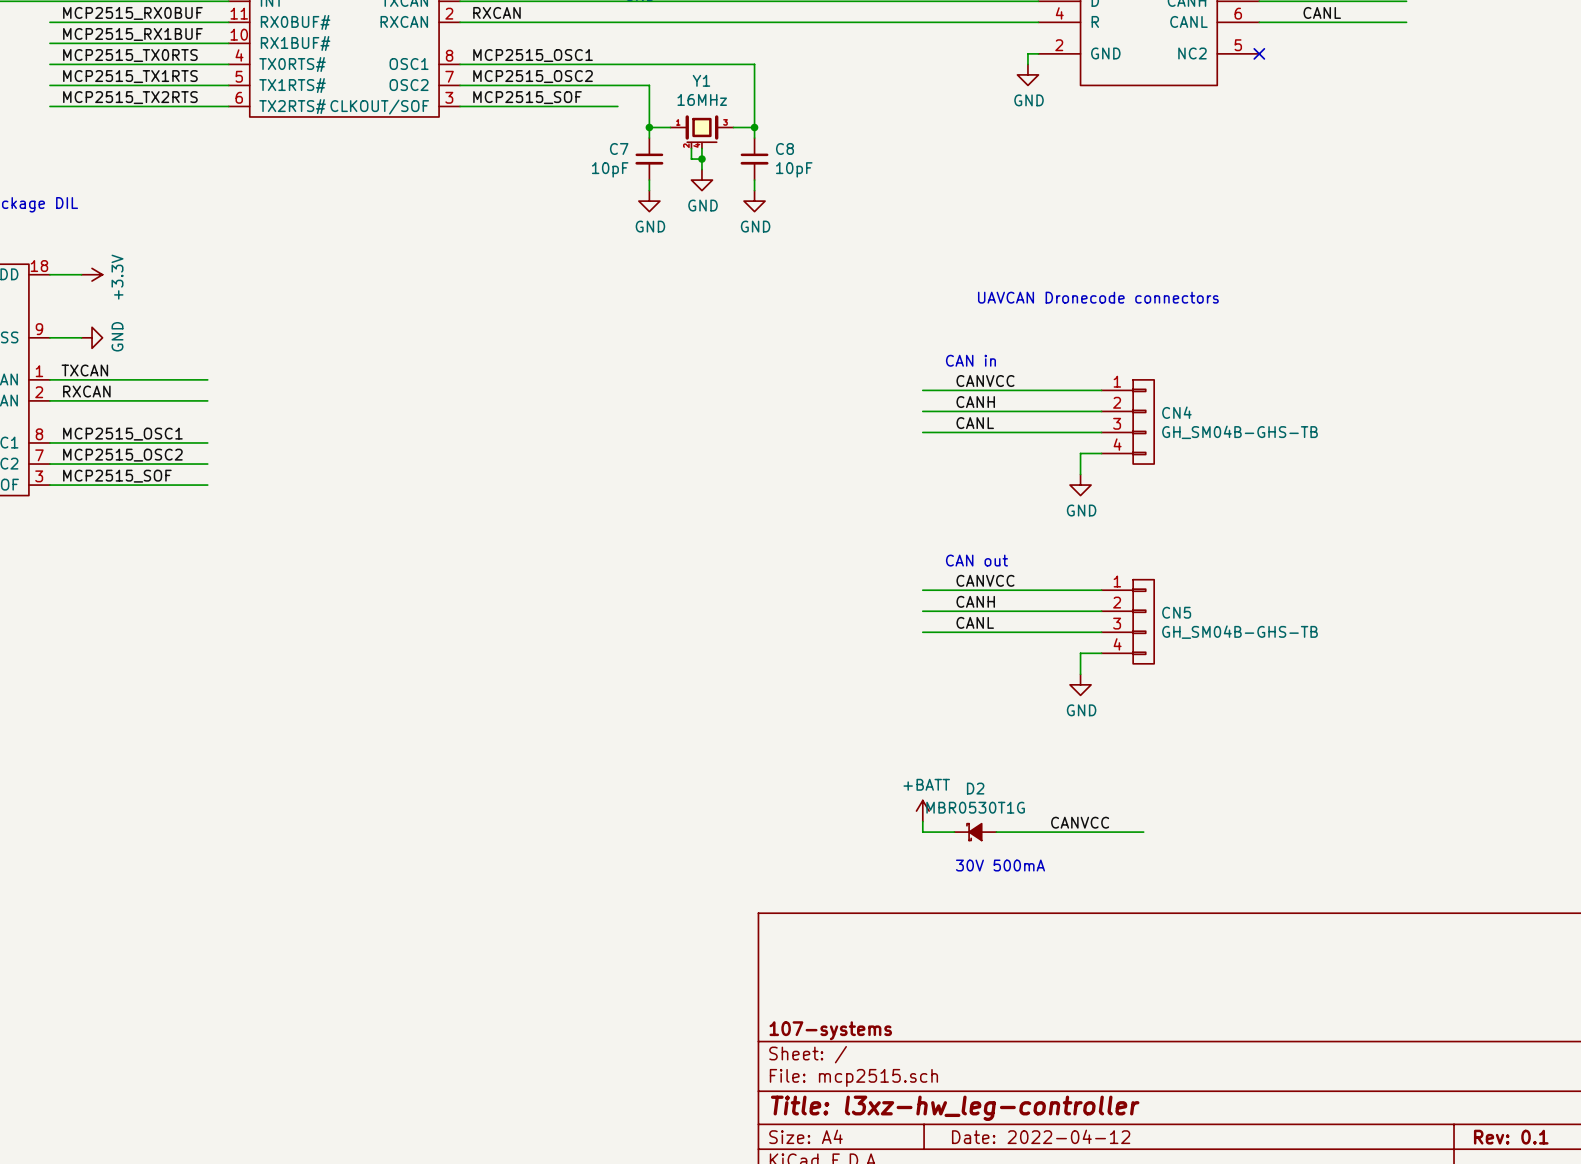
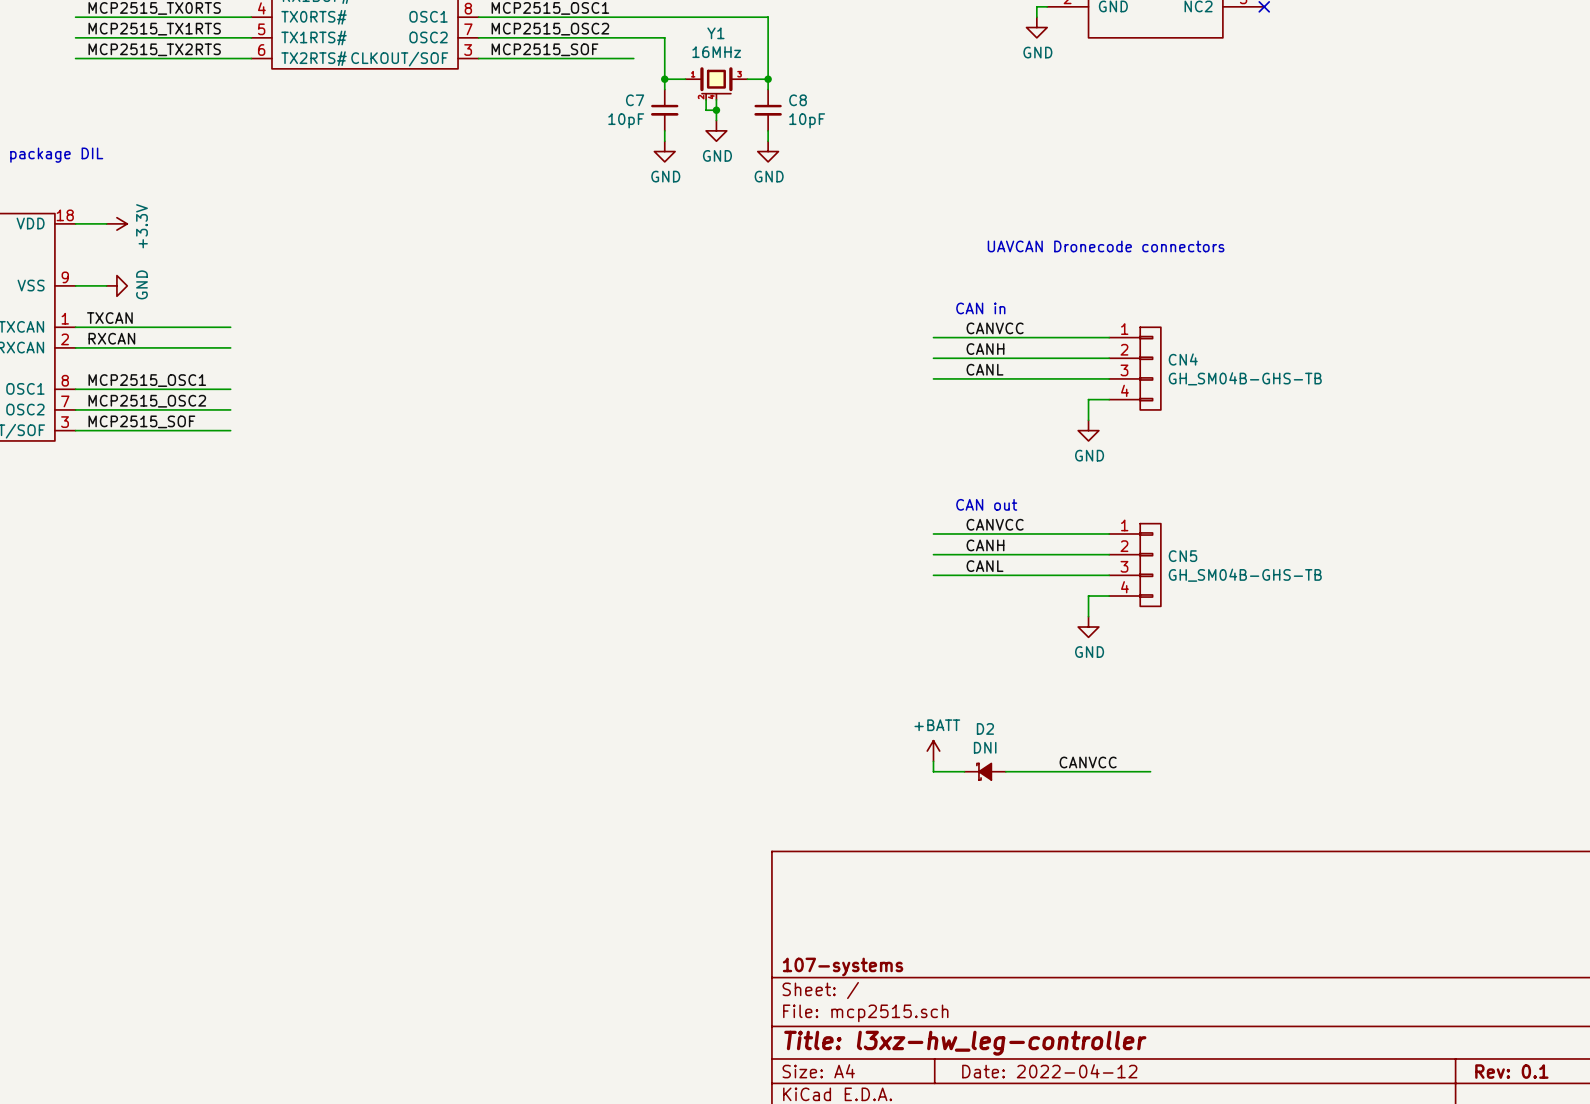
D2 value: MBR0530T1G (975, 807) -> DNI (985, 747)
text: 30V 500mA (1000, 865) -> none

